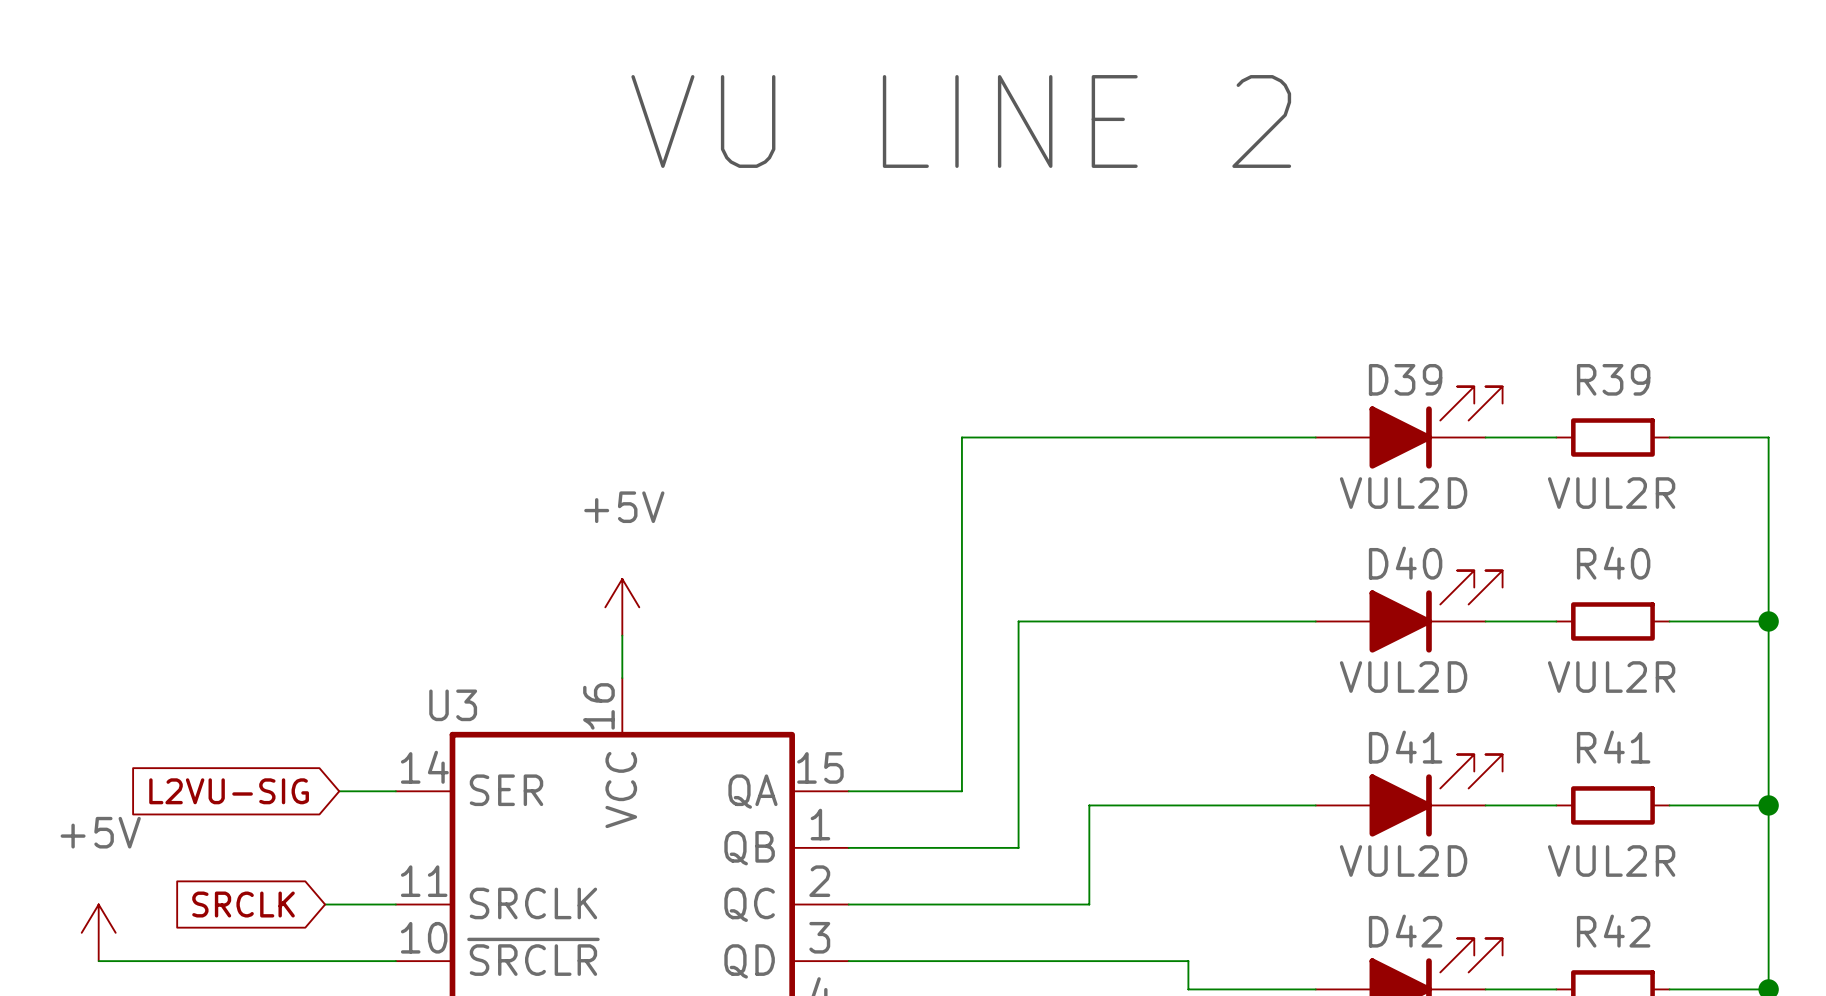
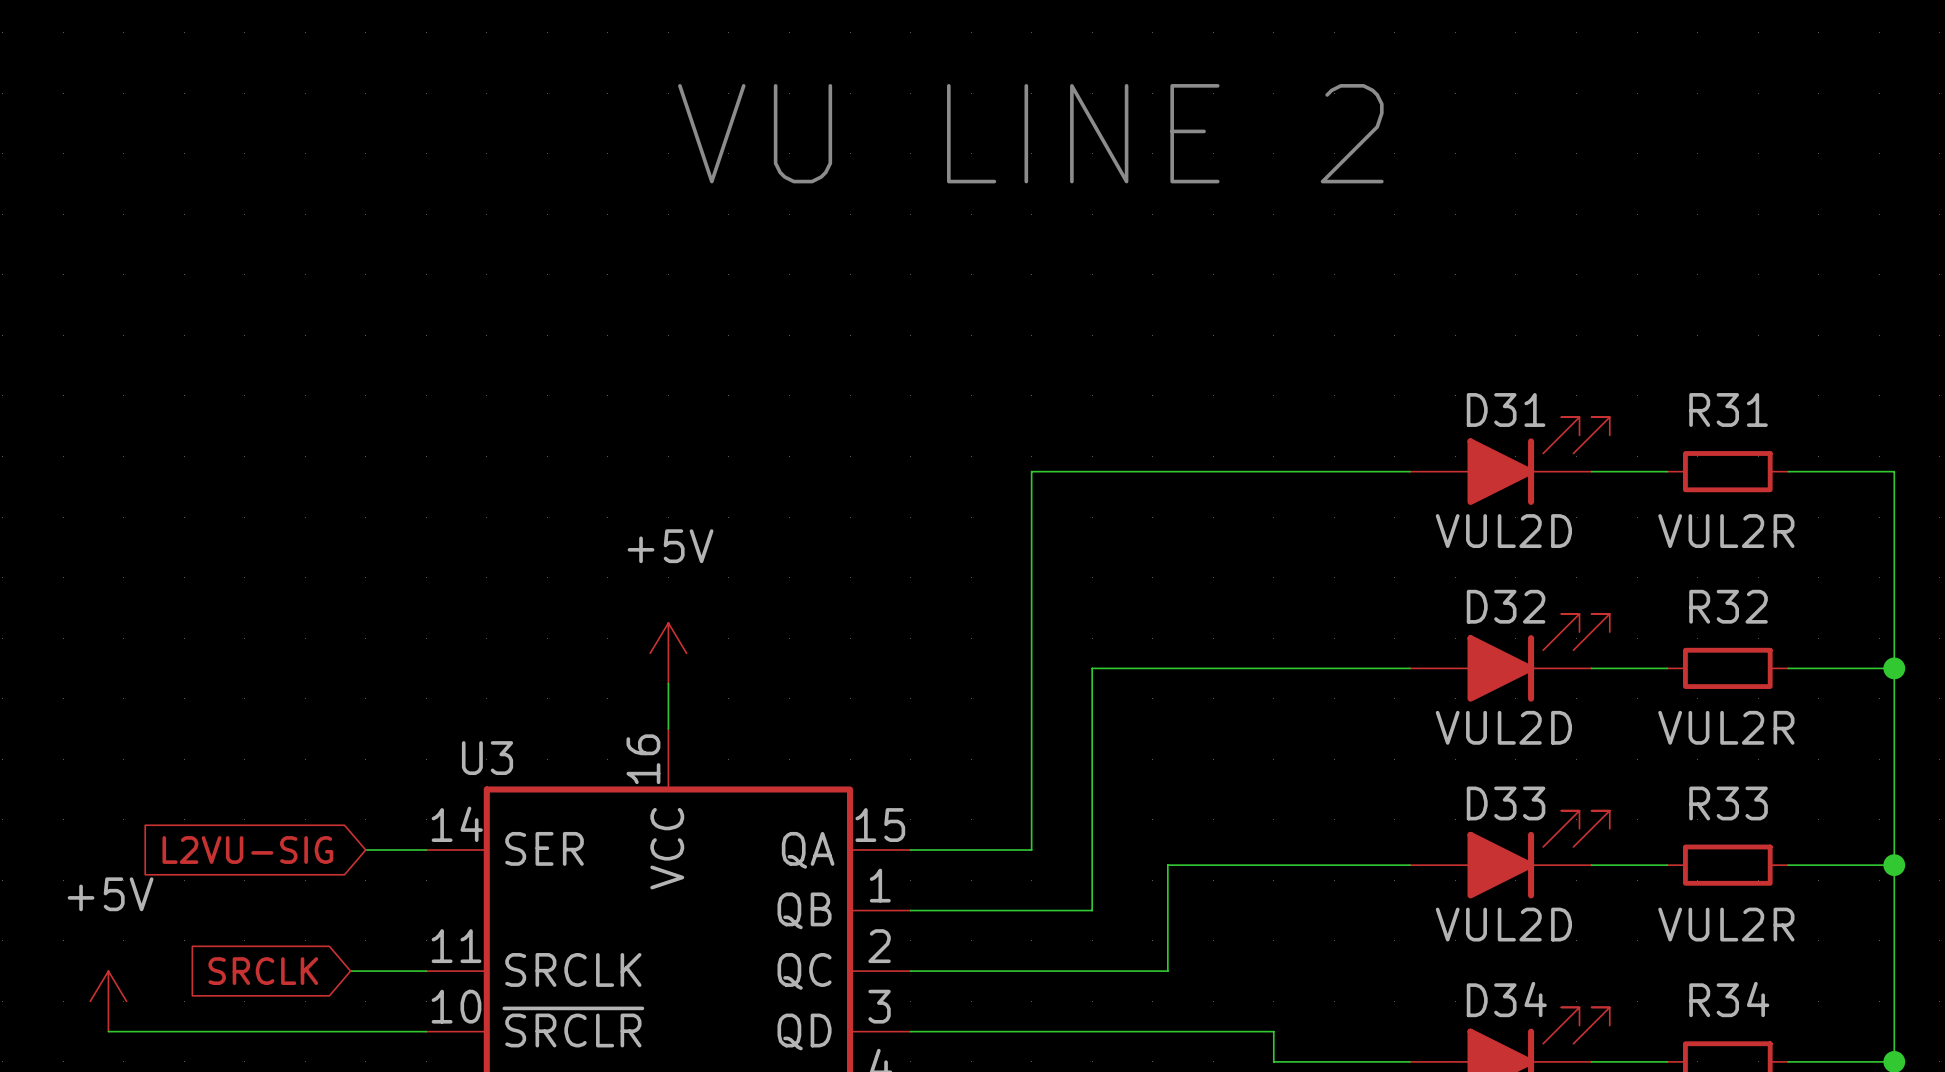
D39 name: D39 (1405, 379) -> D31 (1506, 409)
R39 name: R39 (1613, 379) -> R31 (1728, 409)
D40 name: D40 (1405, 563) -> D32 (1506, 606)
R40 name: R40 (1613, 563) -> R32 (1728, 606)
D41 name: D41 (1405, 747) -> D33 (1506, 803)
R41 name: R41 (1613, 747) -> R33 (1728, 803)
D42 name: D42 (1405, 931) -> D34 (1506, 999)
R42 name: R42 (1613, 931) -> R34 (1729, 999)

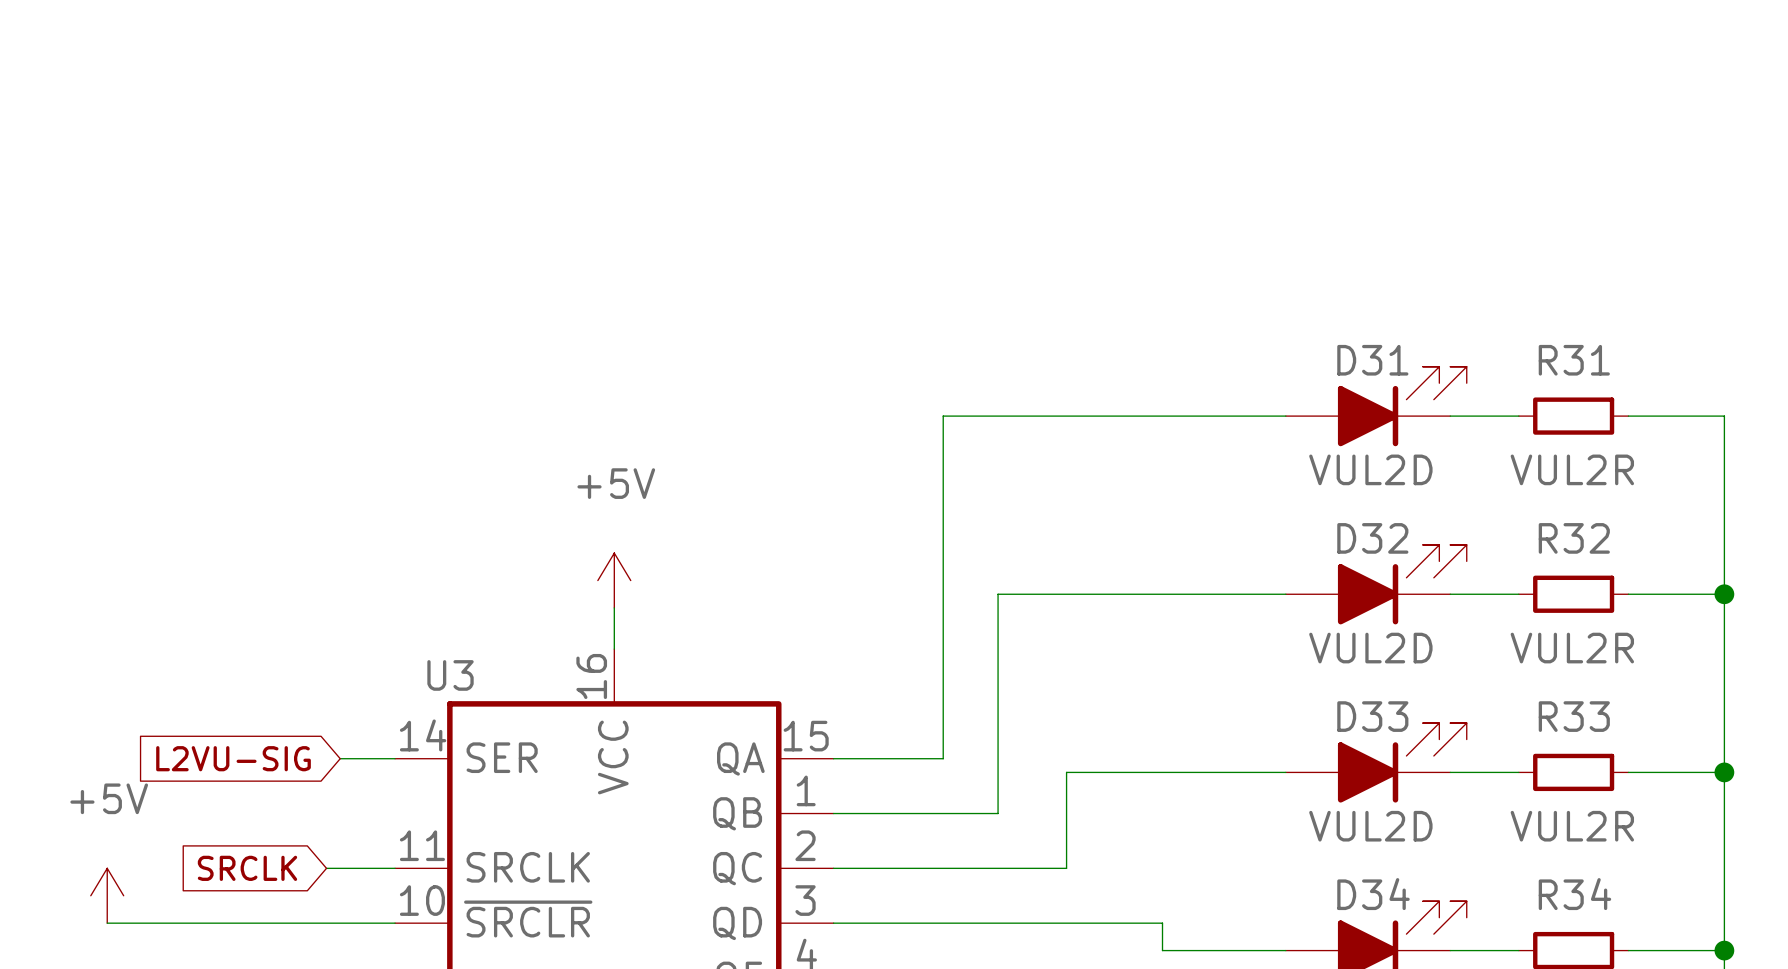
text: VU LINE 2 (1030, 133) -> none

